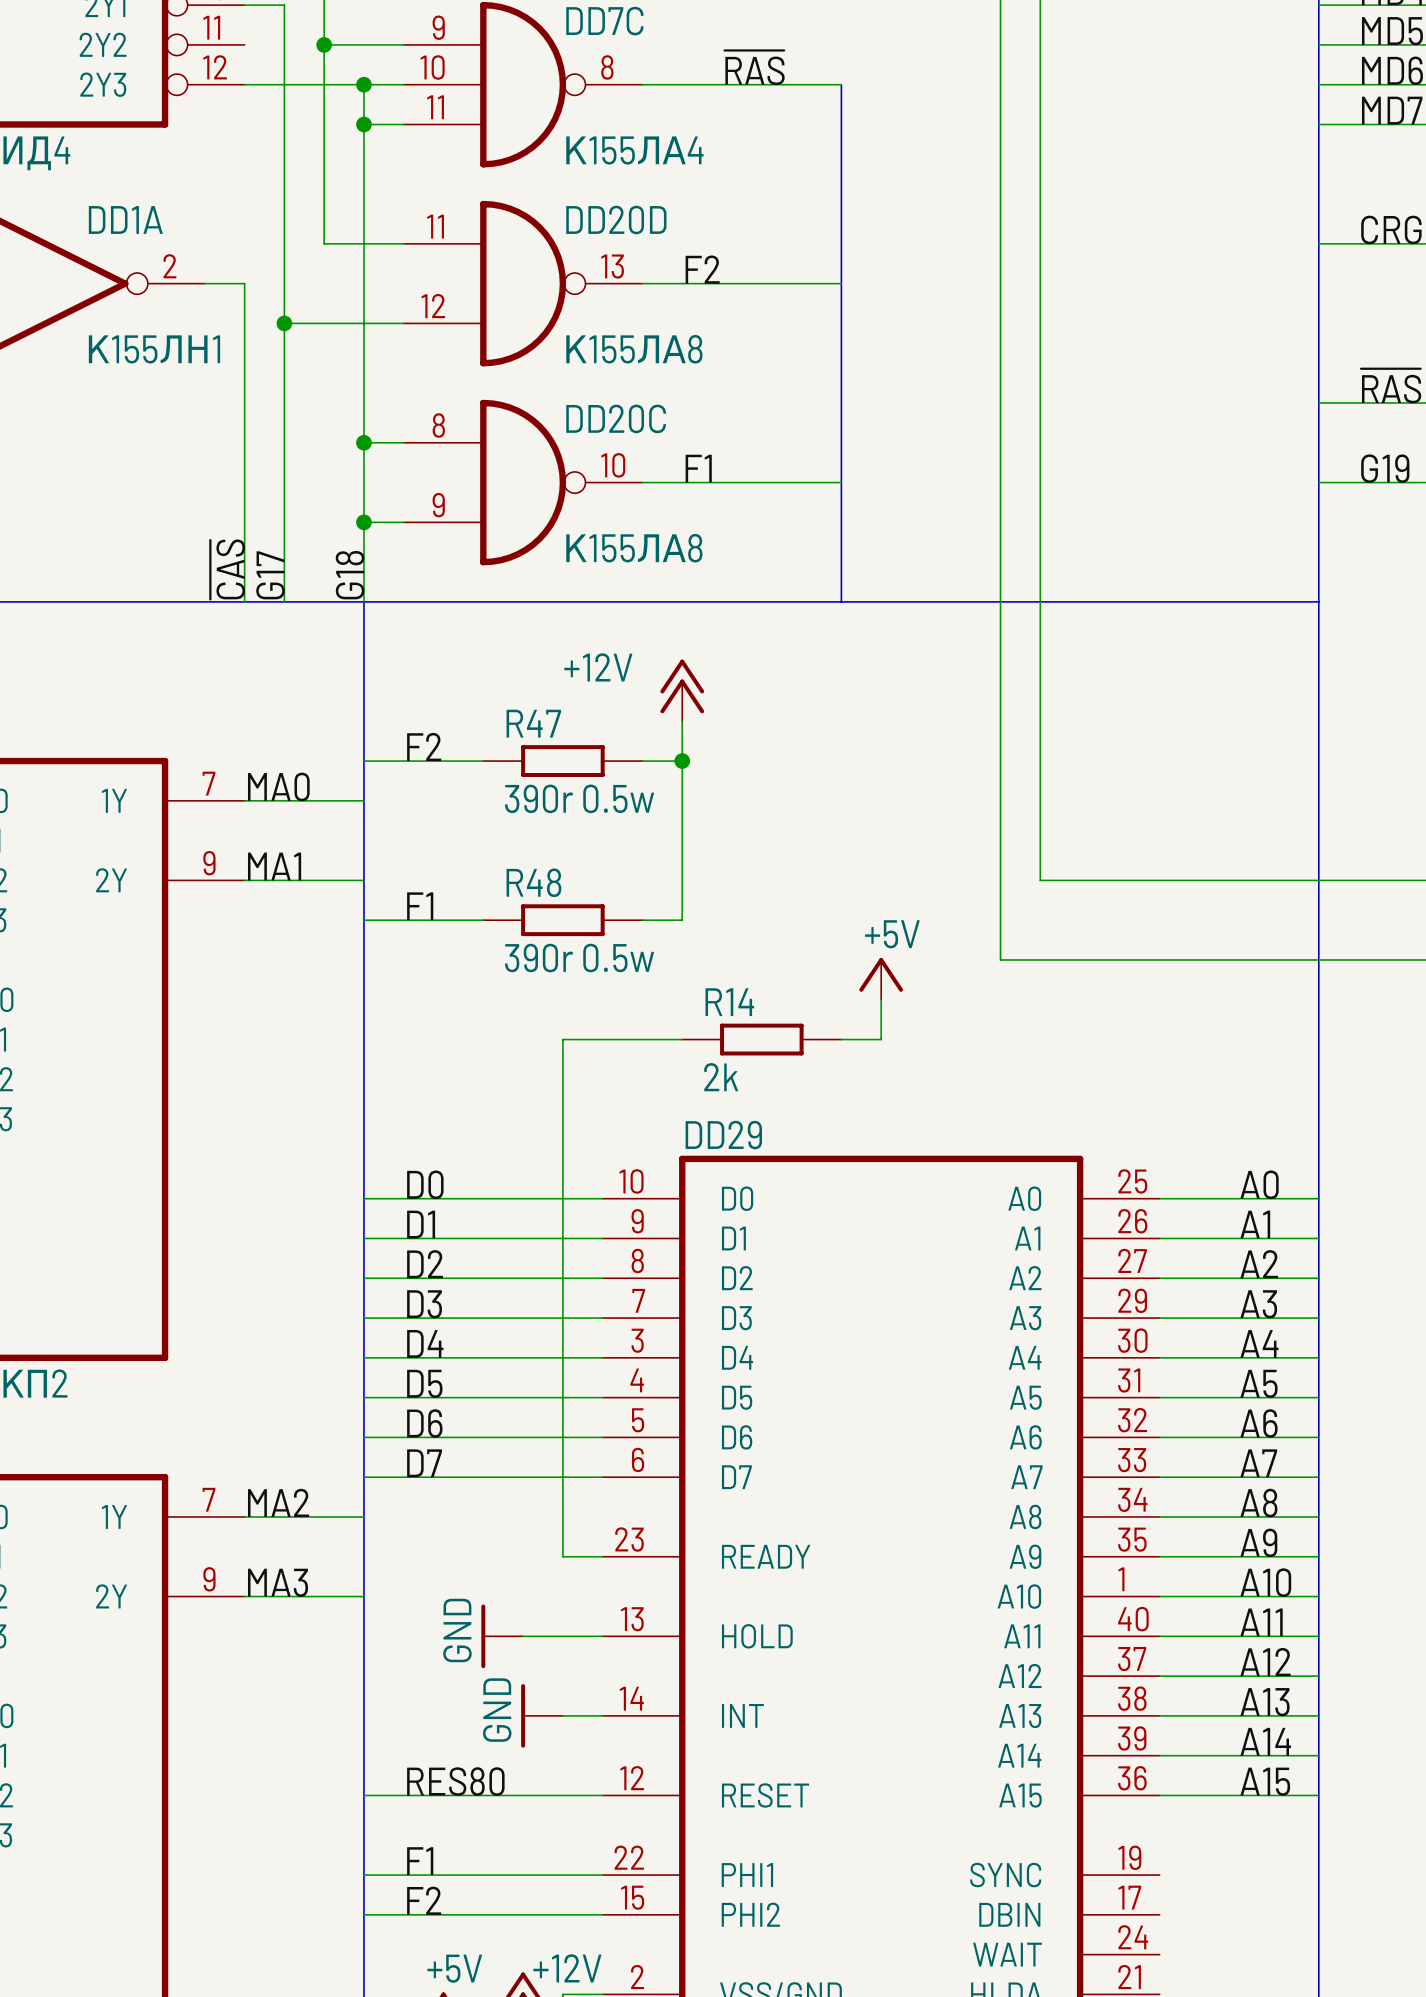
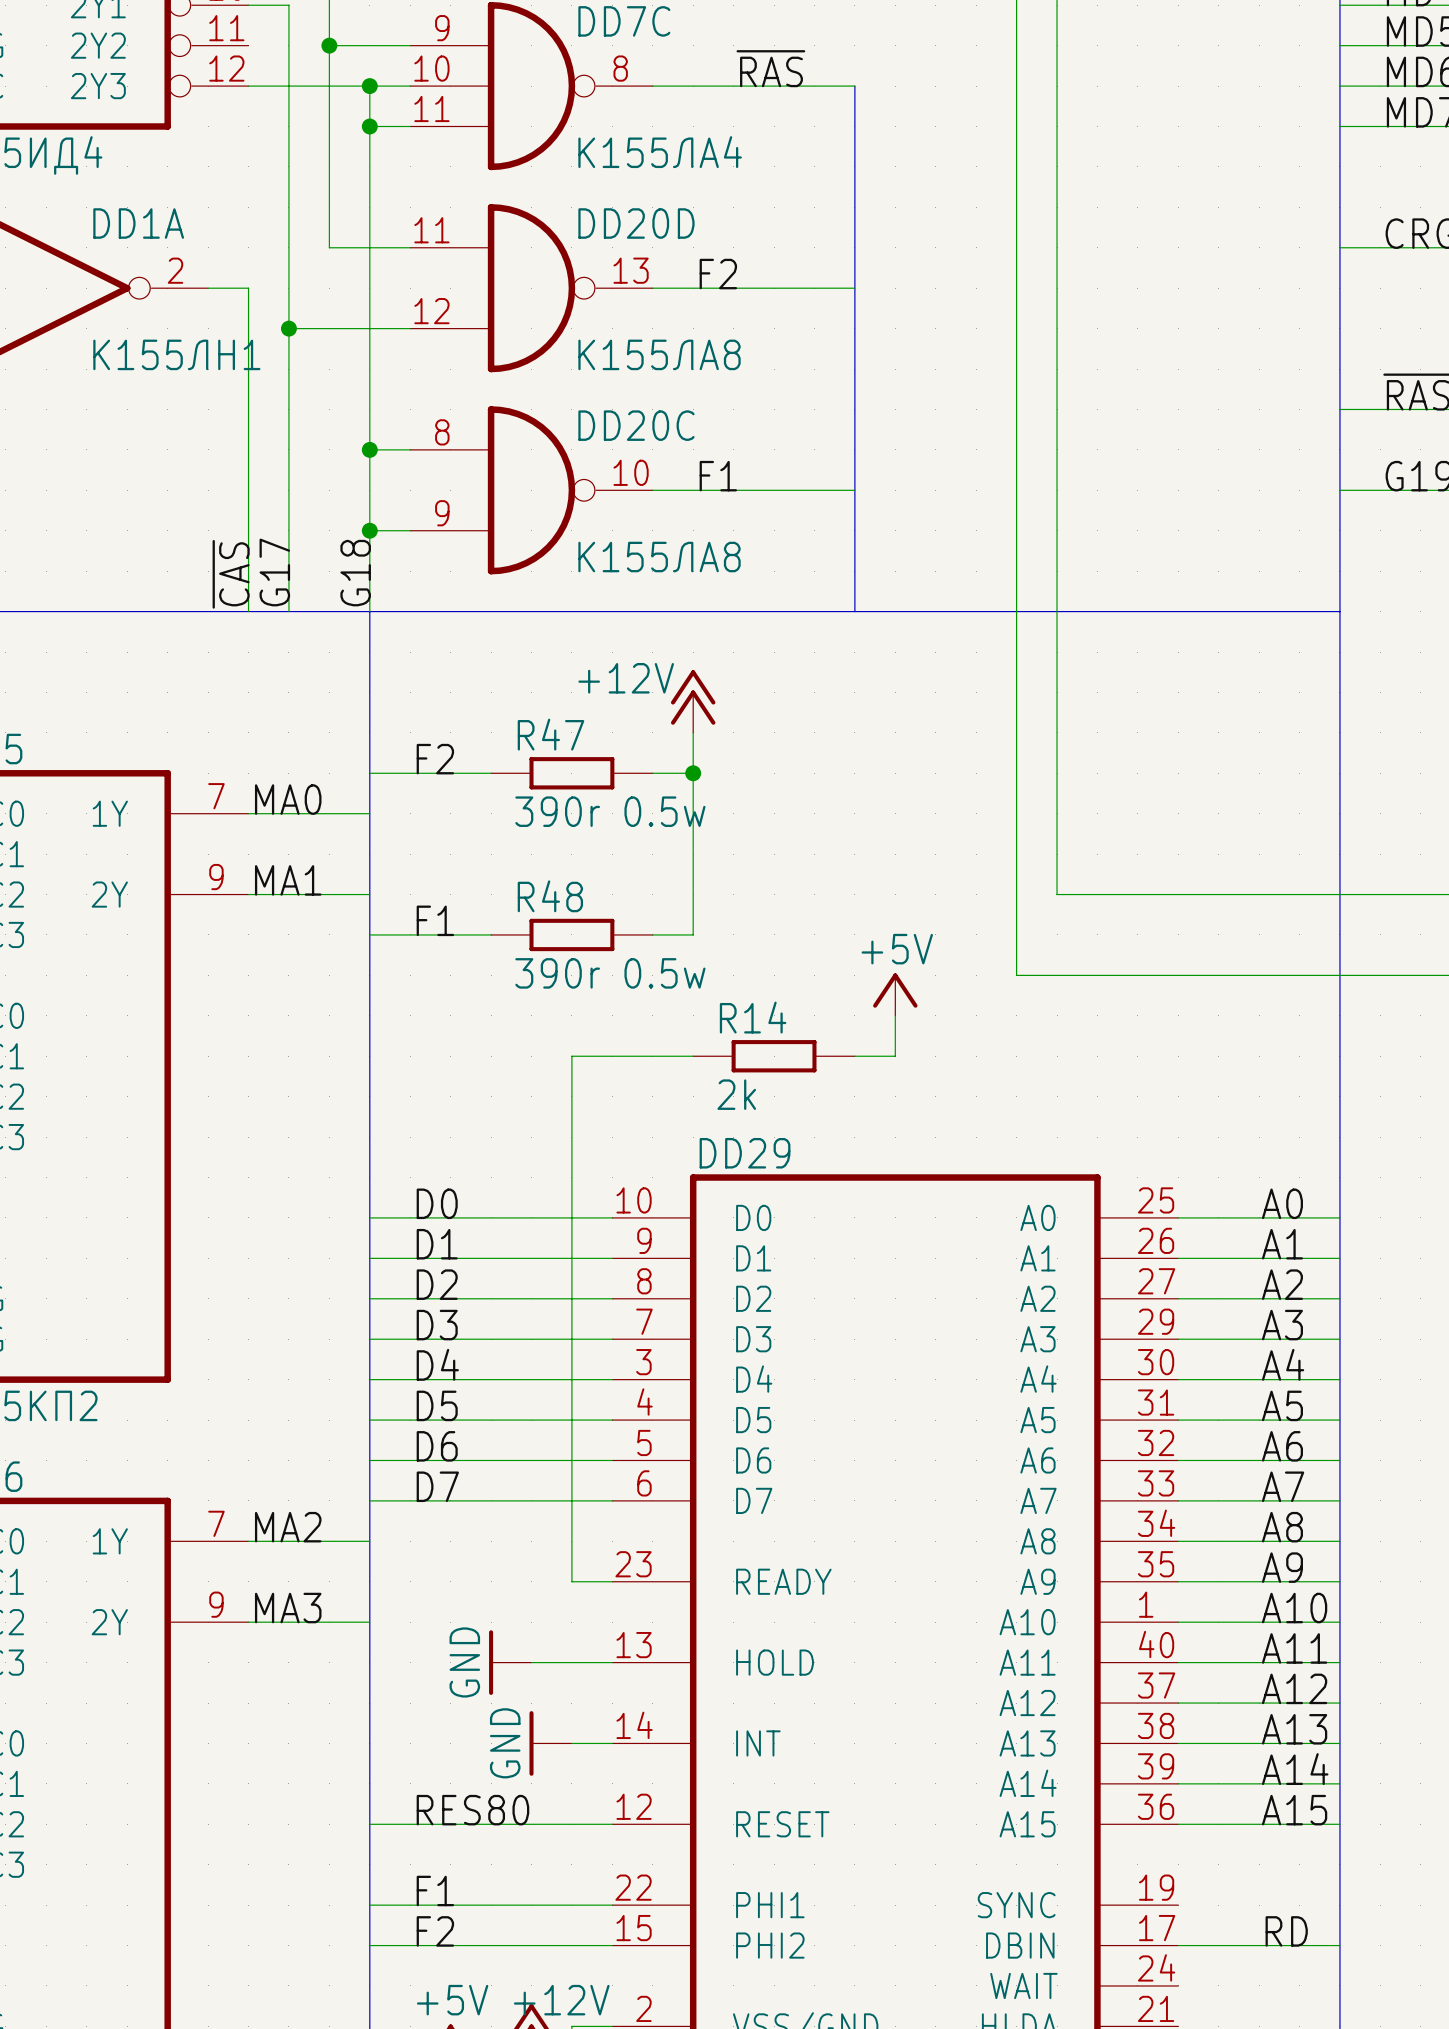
label: none -> RD (1286, 1931)
wire: none -> (1178, 1945) (1339, 1945)

